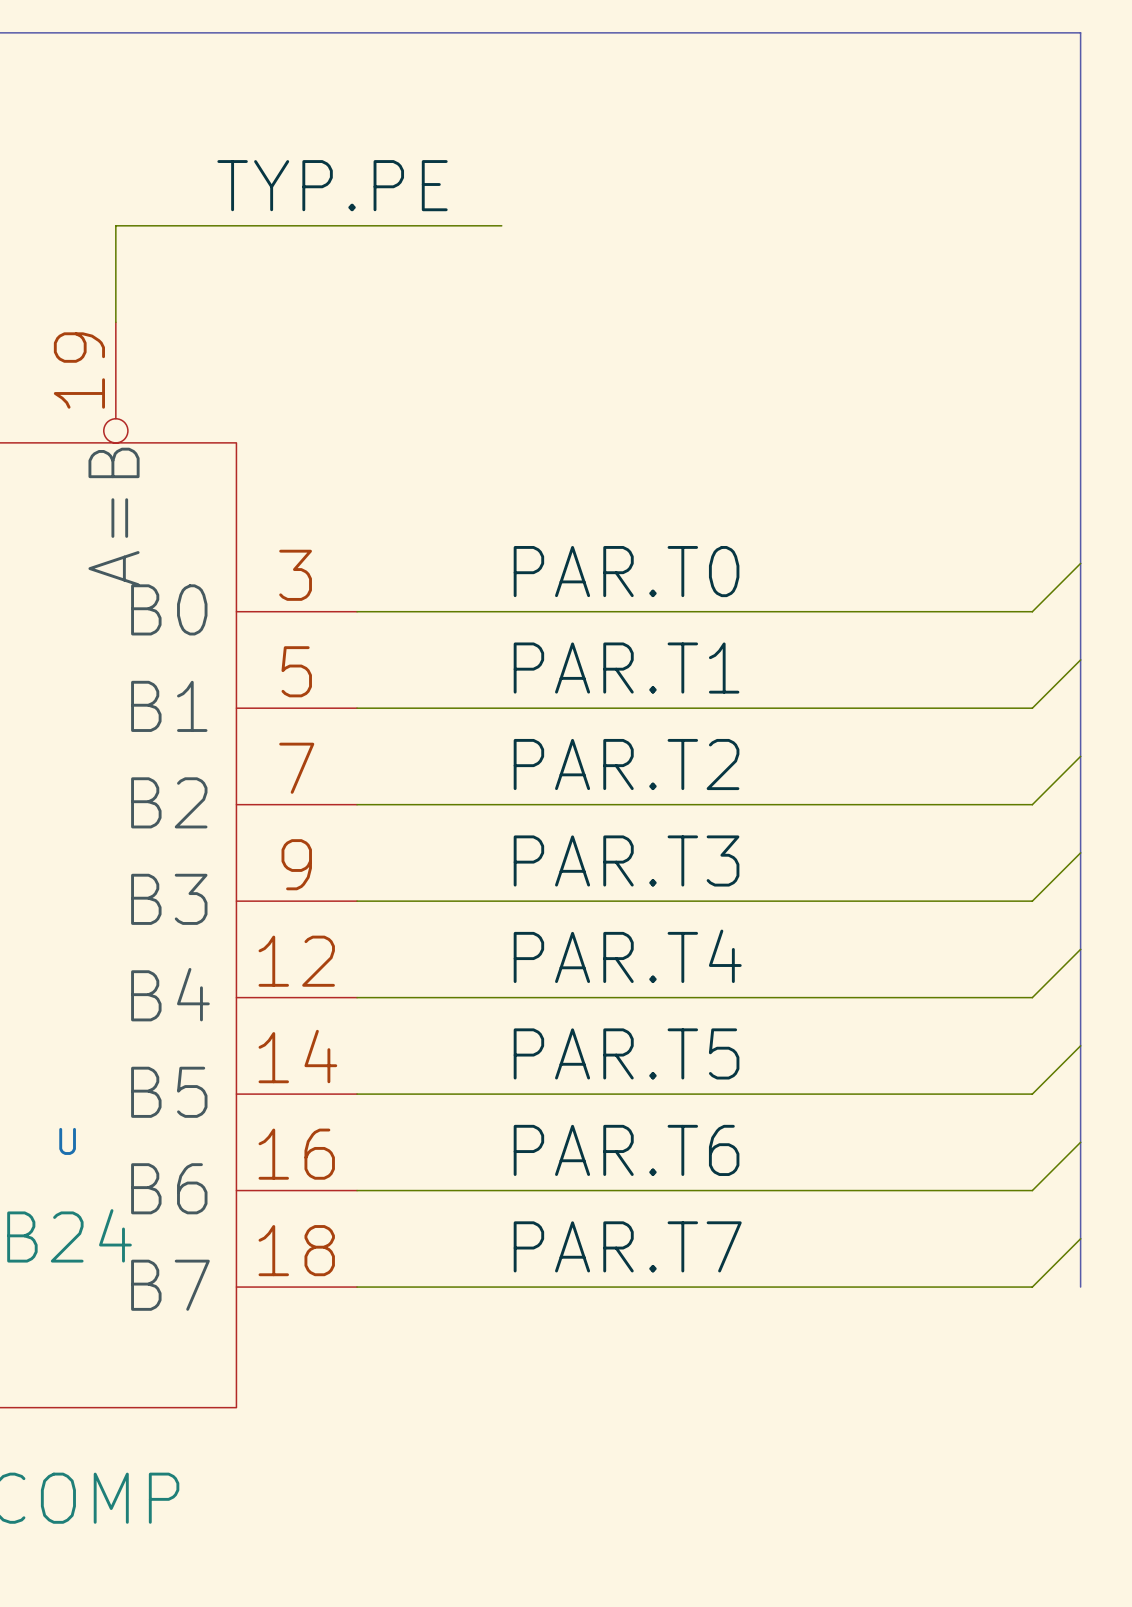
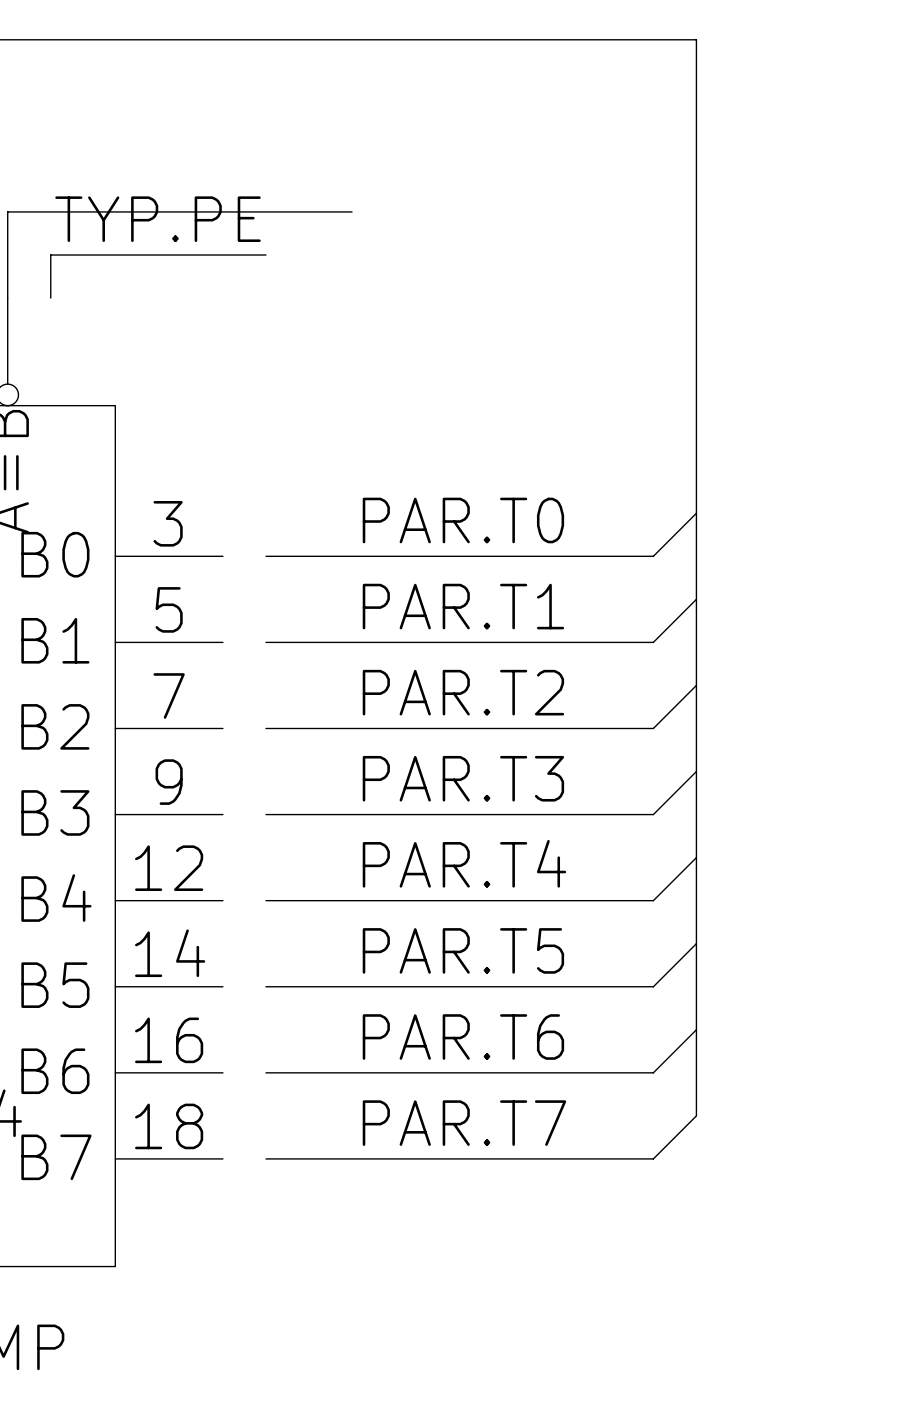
bus: (887, 32) (1080, 32) (1080, 1287) -> (696, 39) (696, 1115)
label position: TYP.PE (332, 185) -> TYP.PE (158, 219)
wire: none -> (265, 255) (50, 255) (50, 298)
wire: (1080, 563) (1032, 611) (839, 611) -> (696, 513) (653, 556)
wire: (357, 611) (405, 611) -> none
wire: (1080, 659) (1032, 708) (839, 708) -> (696, 599) (653, 642)
wire: (357, 708) (405, 708) -> none
wire: (1080, 756) (1032, 804) (839, 804) -> (696, 685) (653, 728)
wire: (357, 804) (405, 804) -> none
wire: (1080, 852) (1032, 901) (839, 901) -> (696, 771) (653, 814)
wire: (357, 901) (405, 901) -> none
wire: (1080, 949) (1032, 997) (839, 997) -> (696, 857) (653, 900)
wire: (357, 997) (405, 997) -> none
wire: (1080, 1045) (1032, 1094) (839, 1094) -> (696, 943) (653, 986)
wire: (357, 1094) (405, 1094) -> none
wire: (1080, 1142) (1032, 1190) (839, 1190) -> (696, 1029) (653, 1072)
wire: (357, 1190) (405, 1190) -> none
wire: (1080, 1238) (1032, 1287) (839, 1287) -> (696, 1115) (653, 1158)
wire: (357, 1287) (405, 1287) -> none

